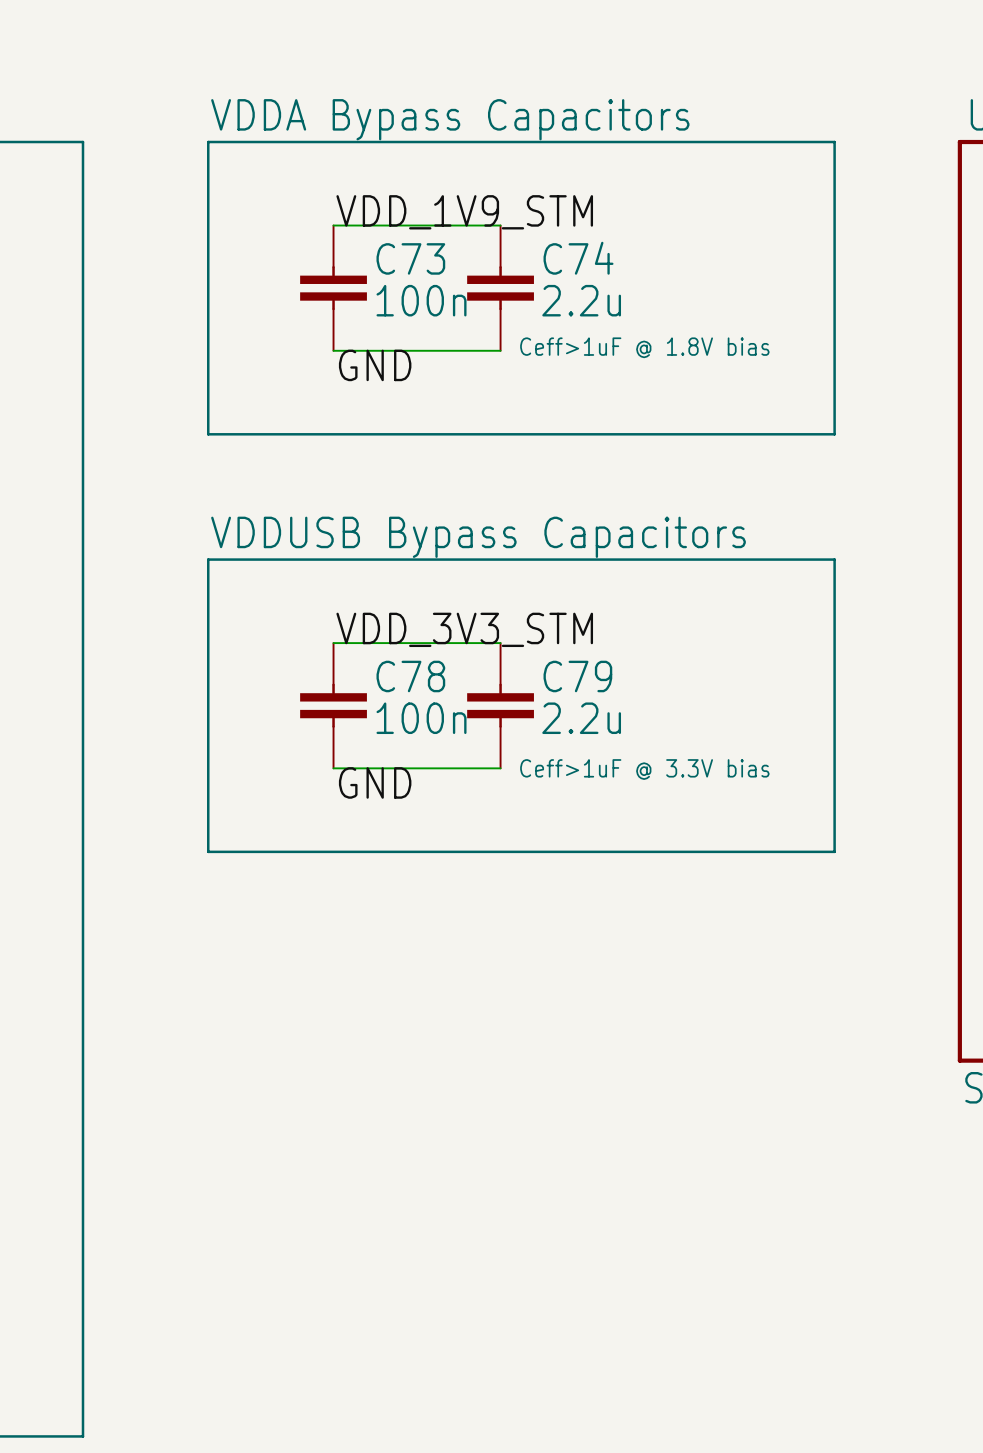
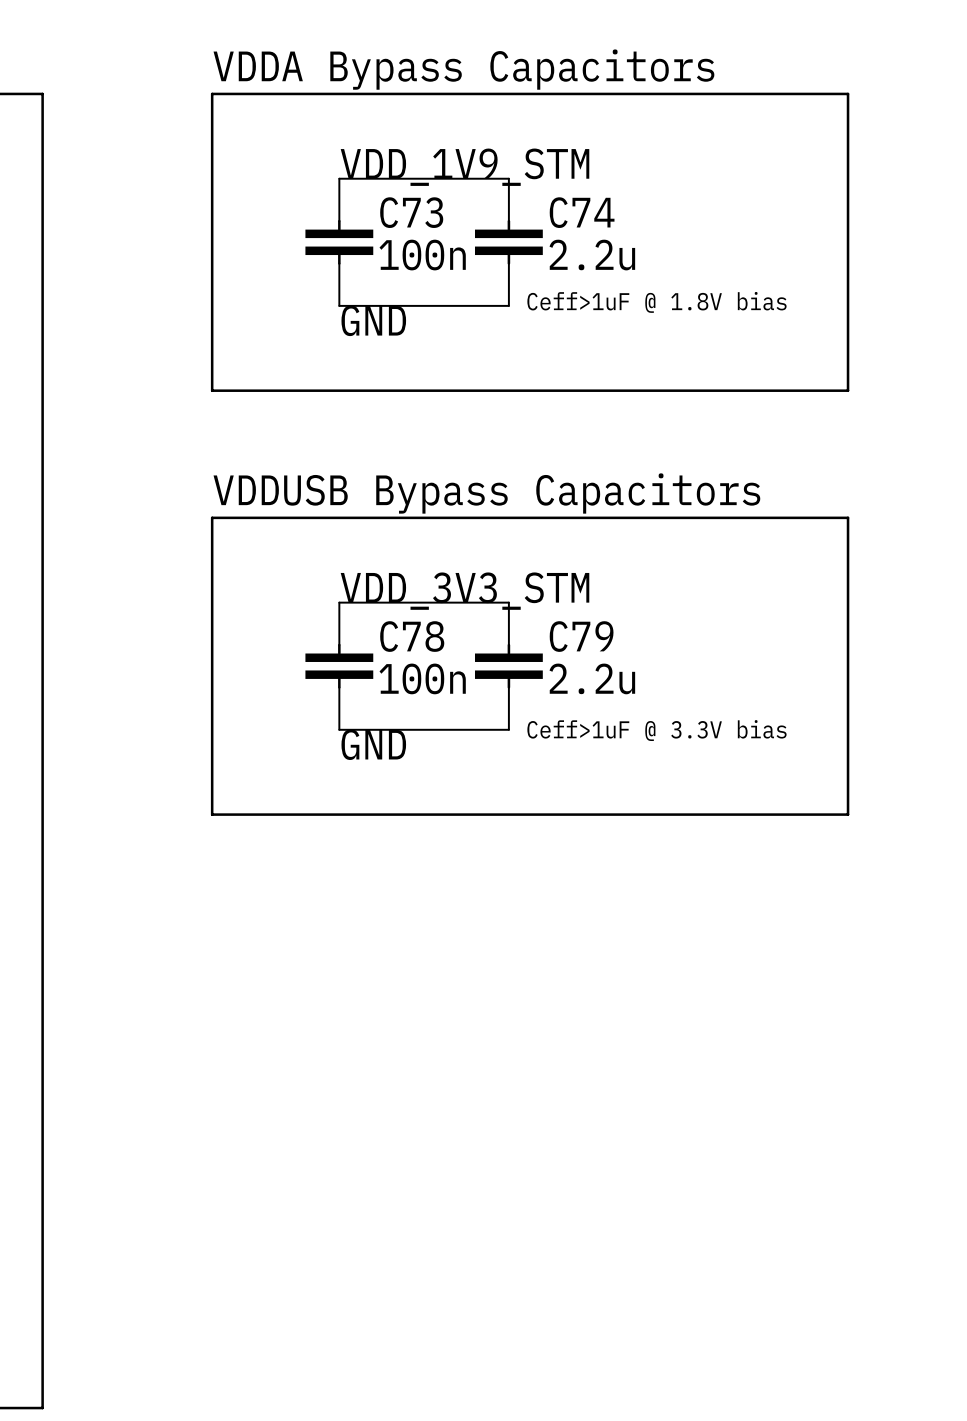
line: (41, 142) (82, 142) (82, 1436) (41, 1436) -> (42, 93) (42, 1408)

